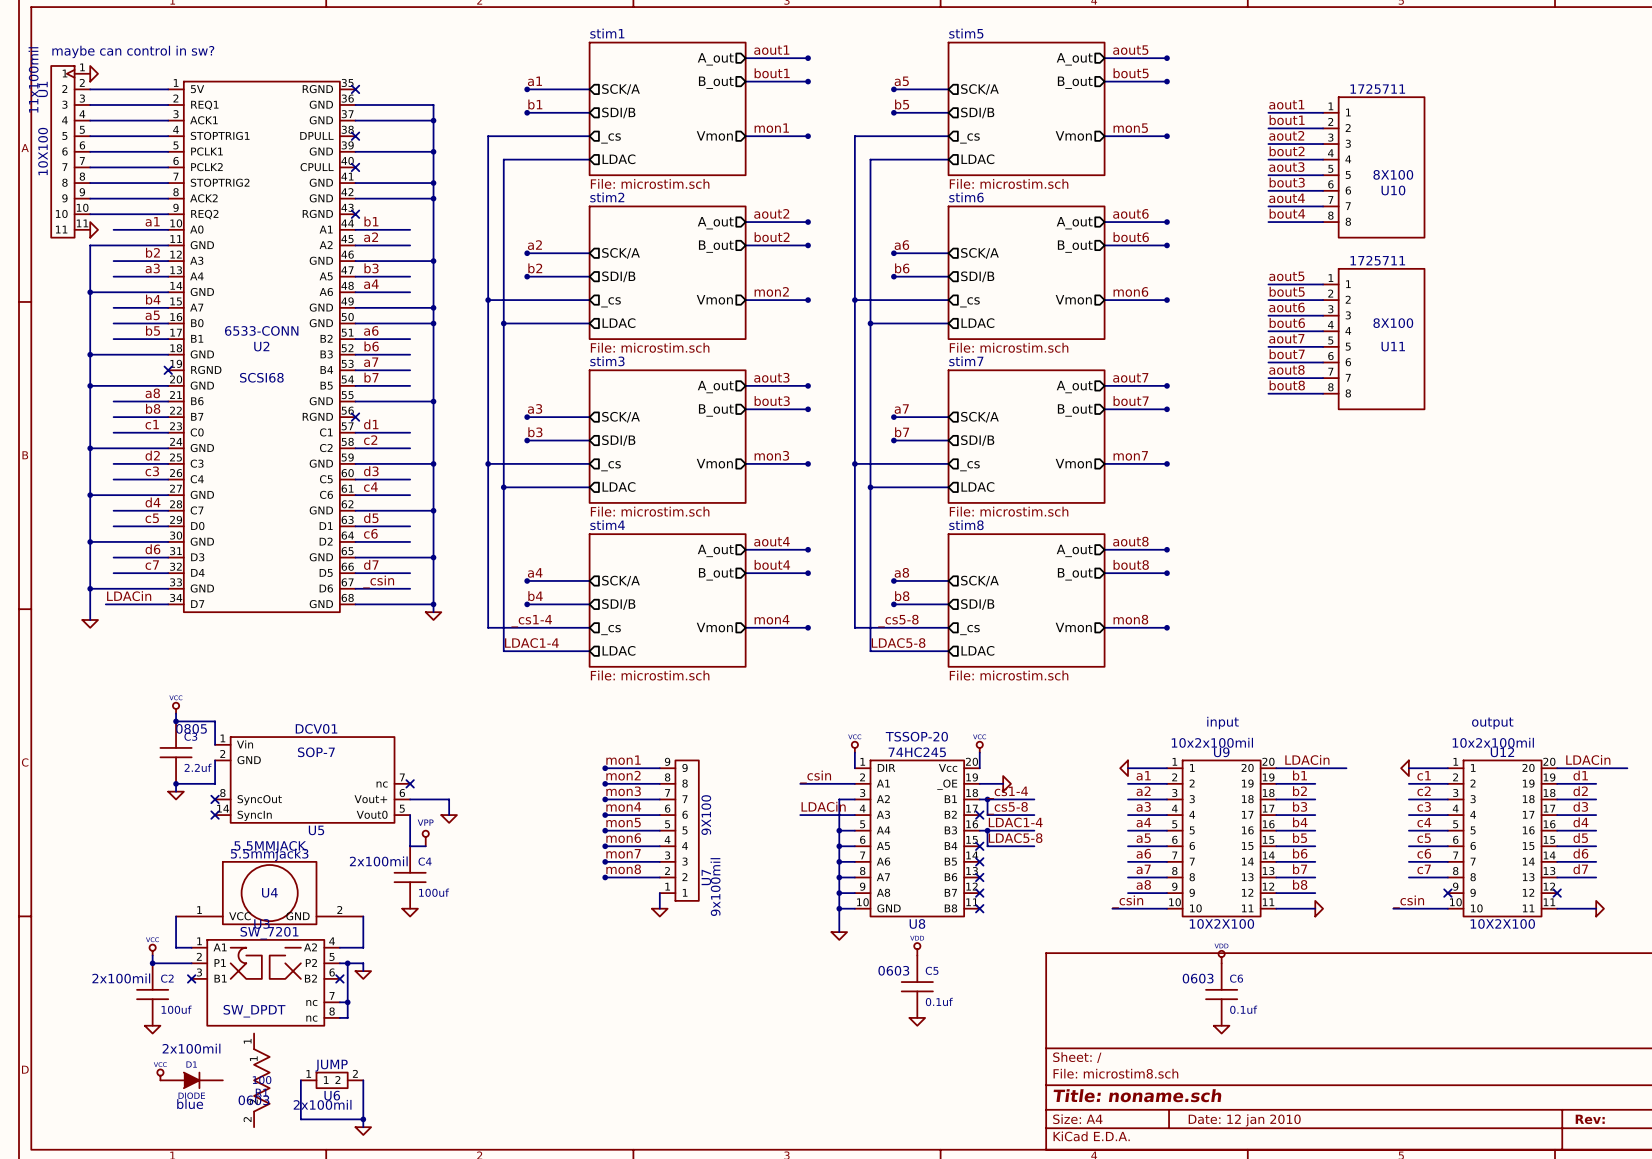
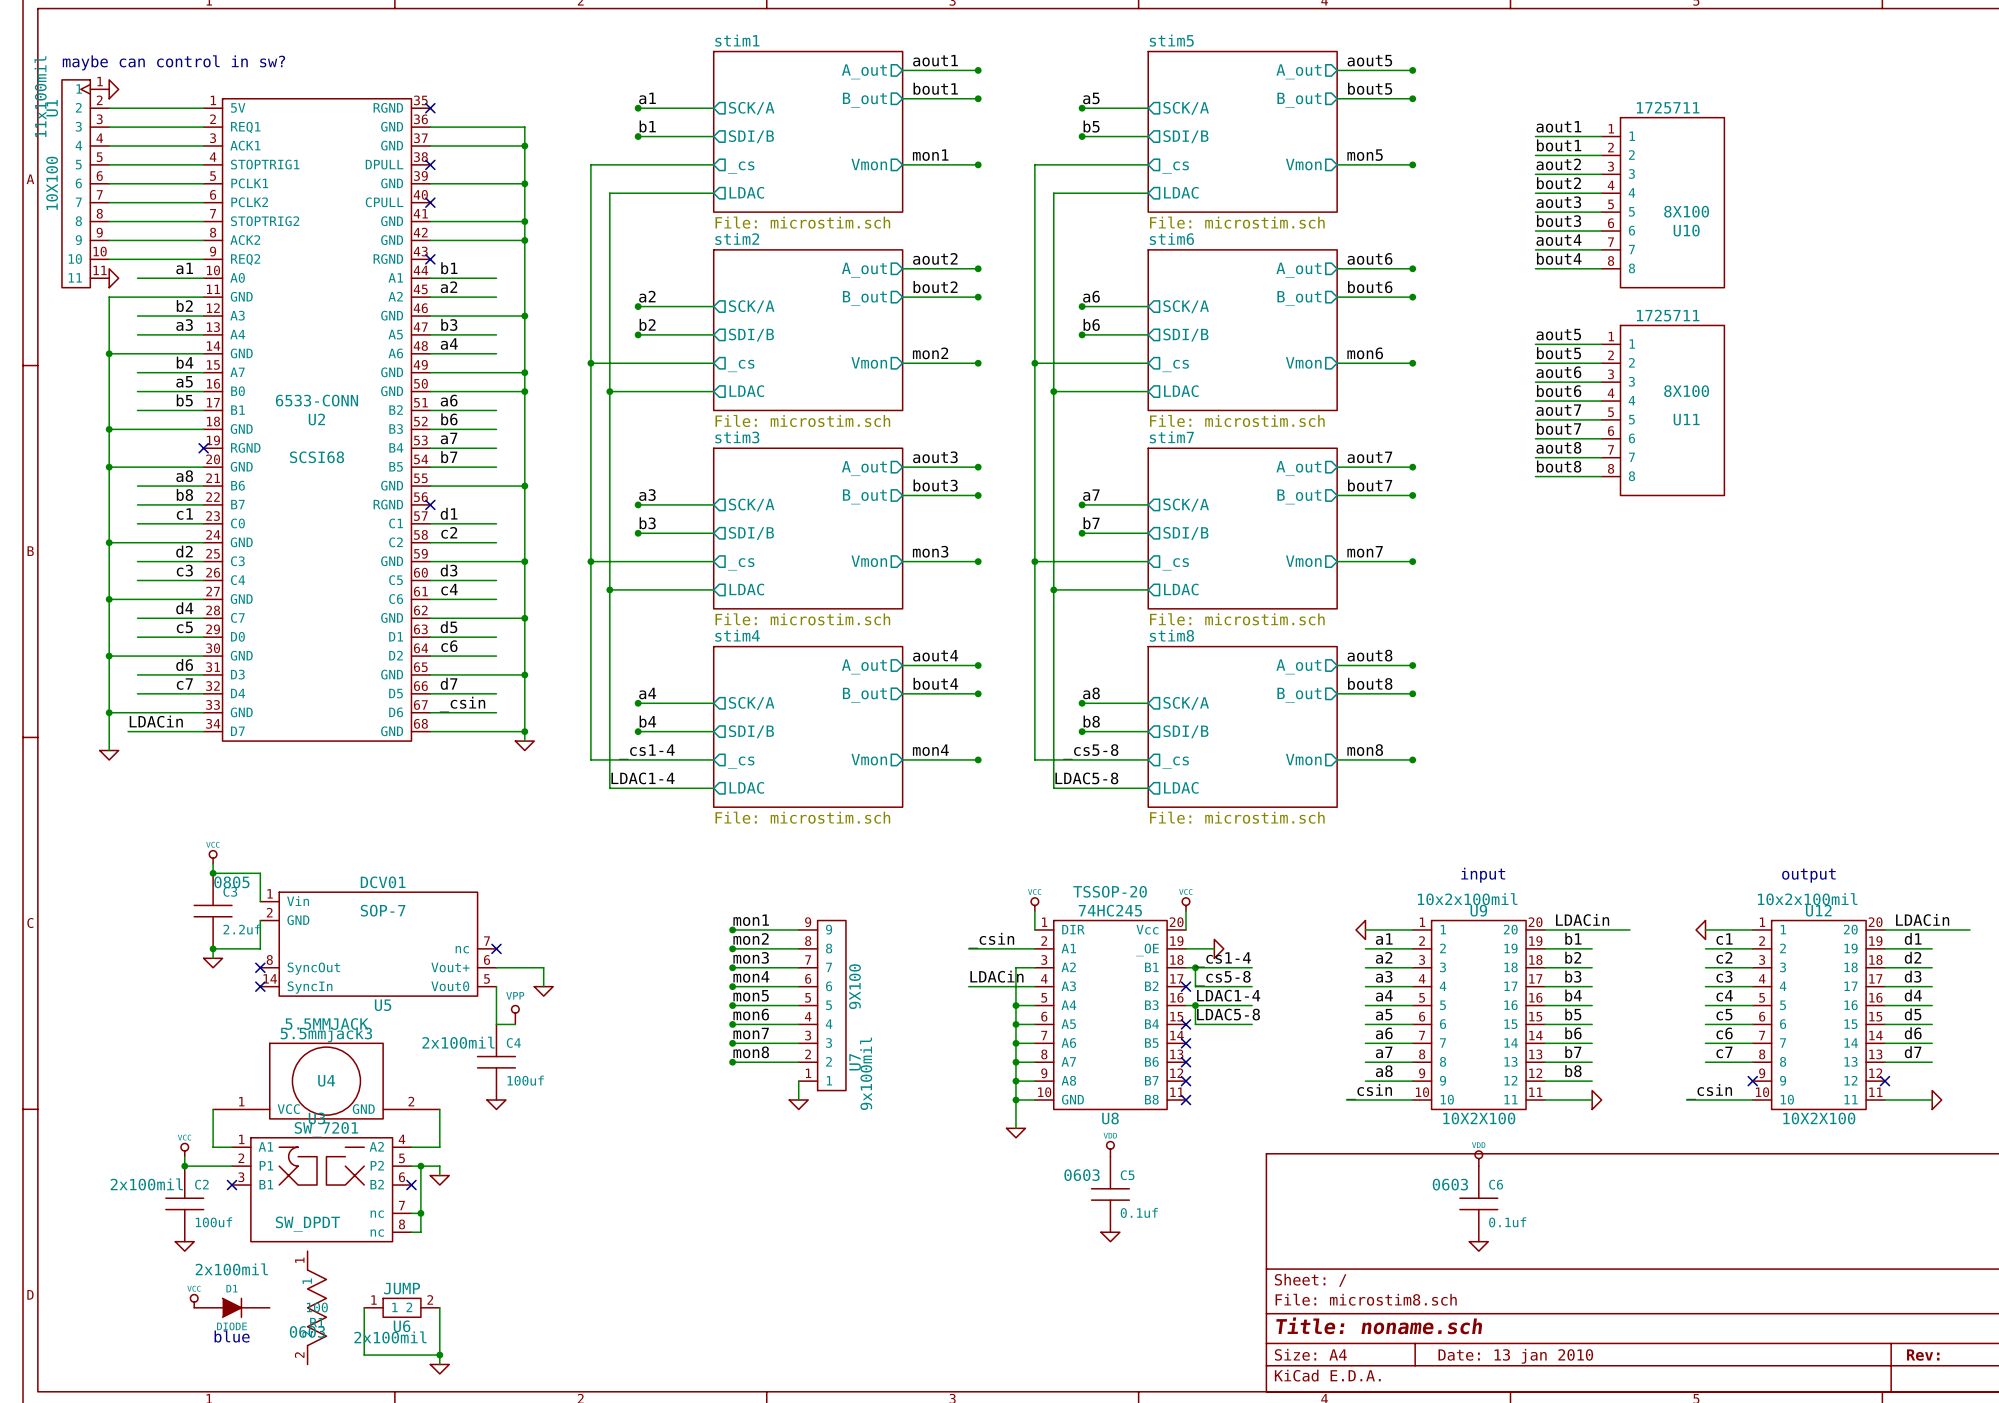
title block: Date: 12 jan 2010 (1244, 1120) -> Date: 13 jan 2010 (1515, 1356)

